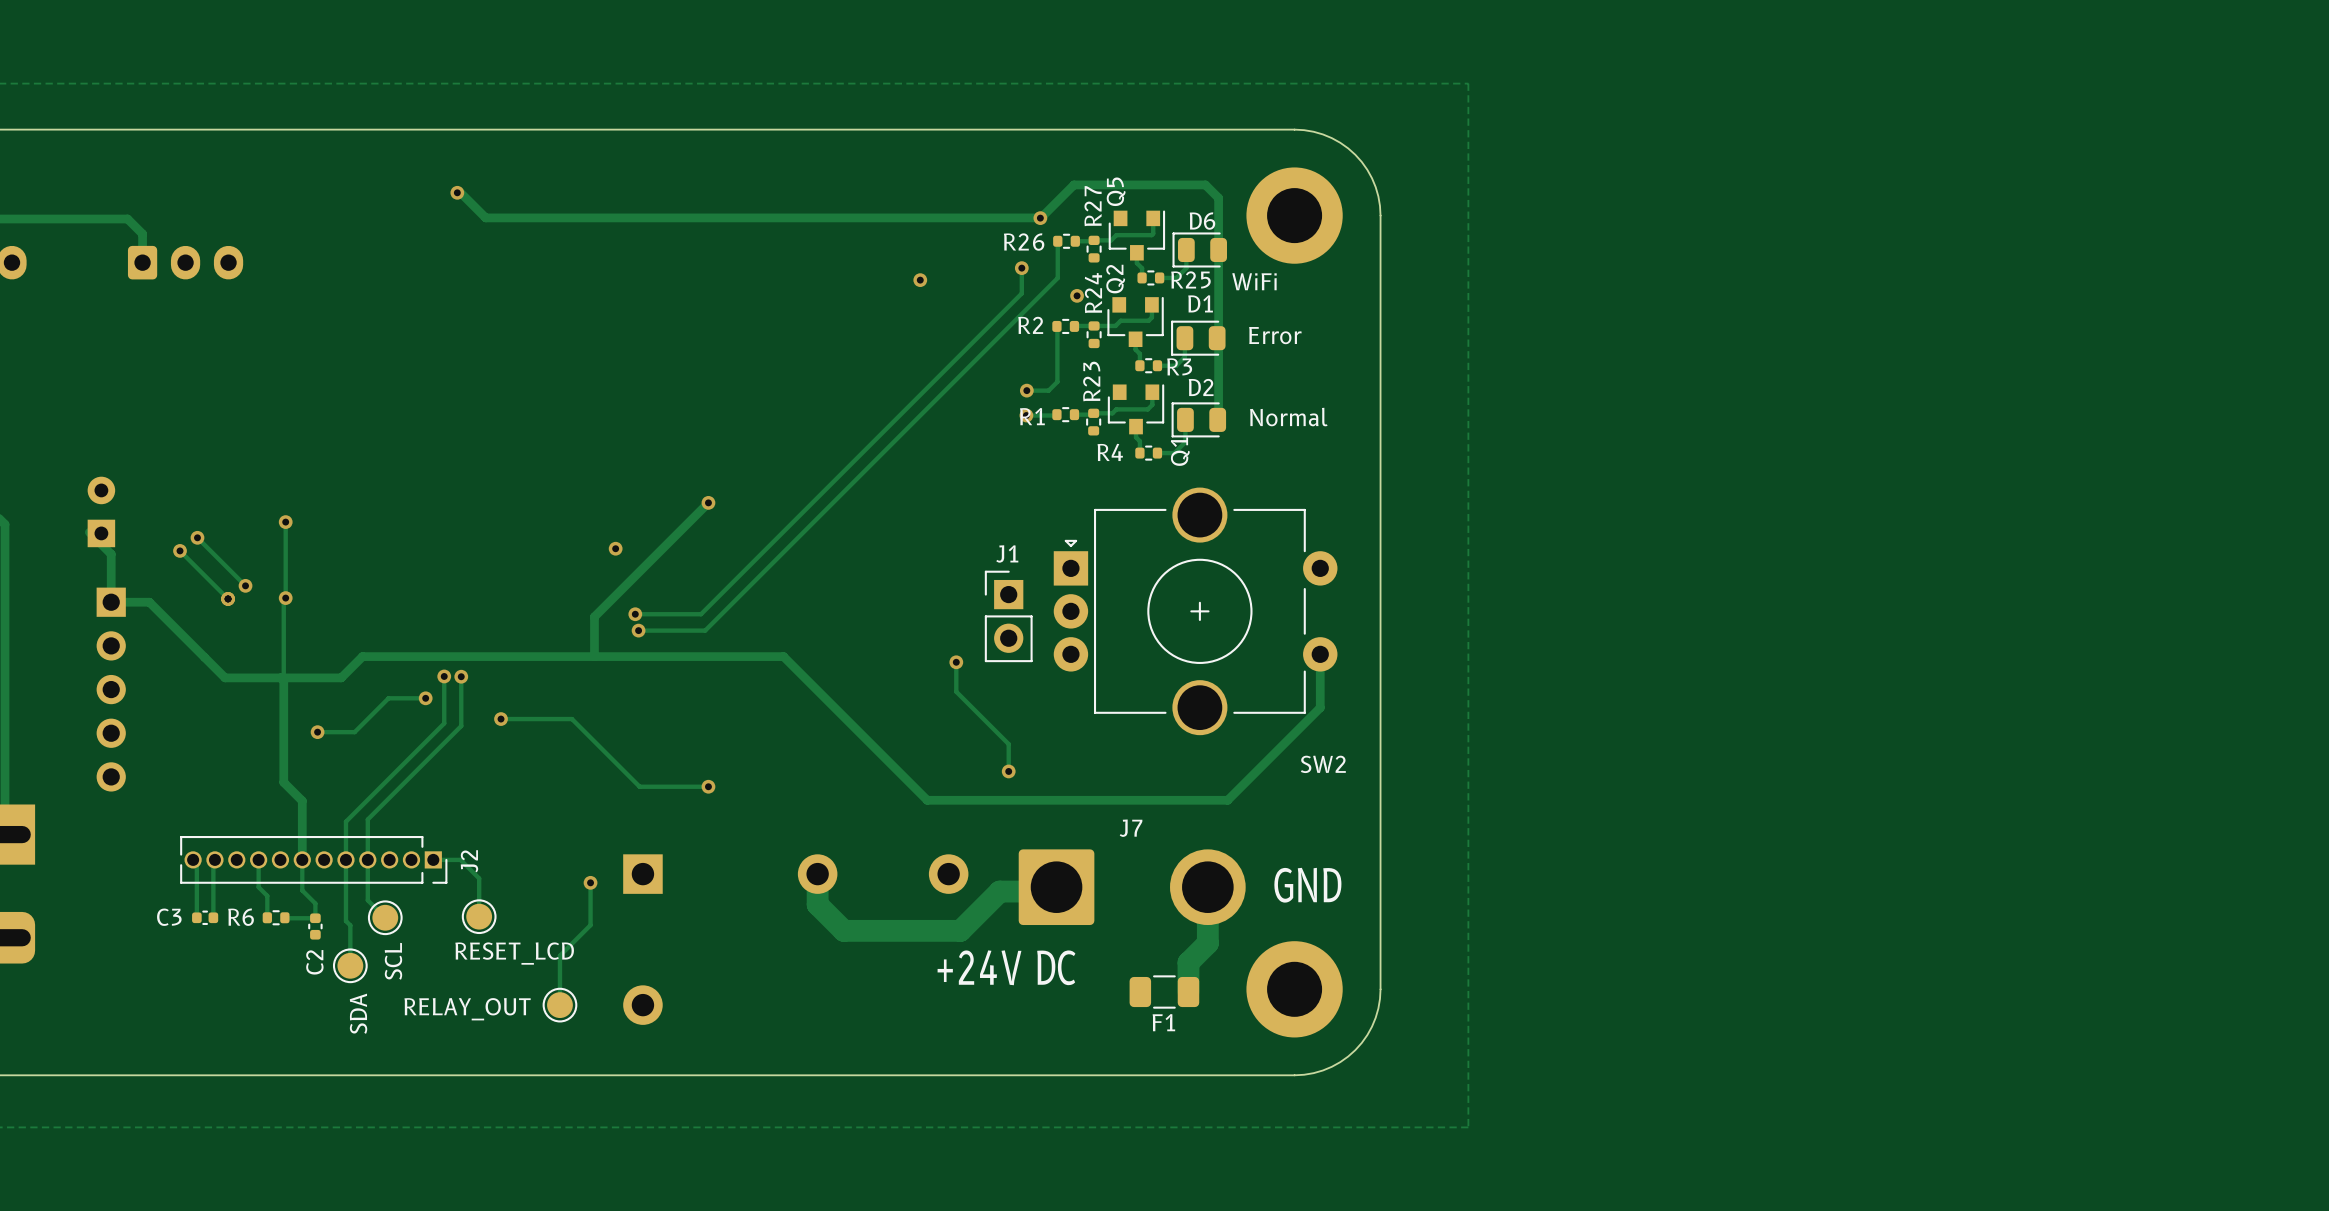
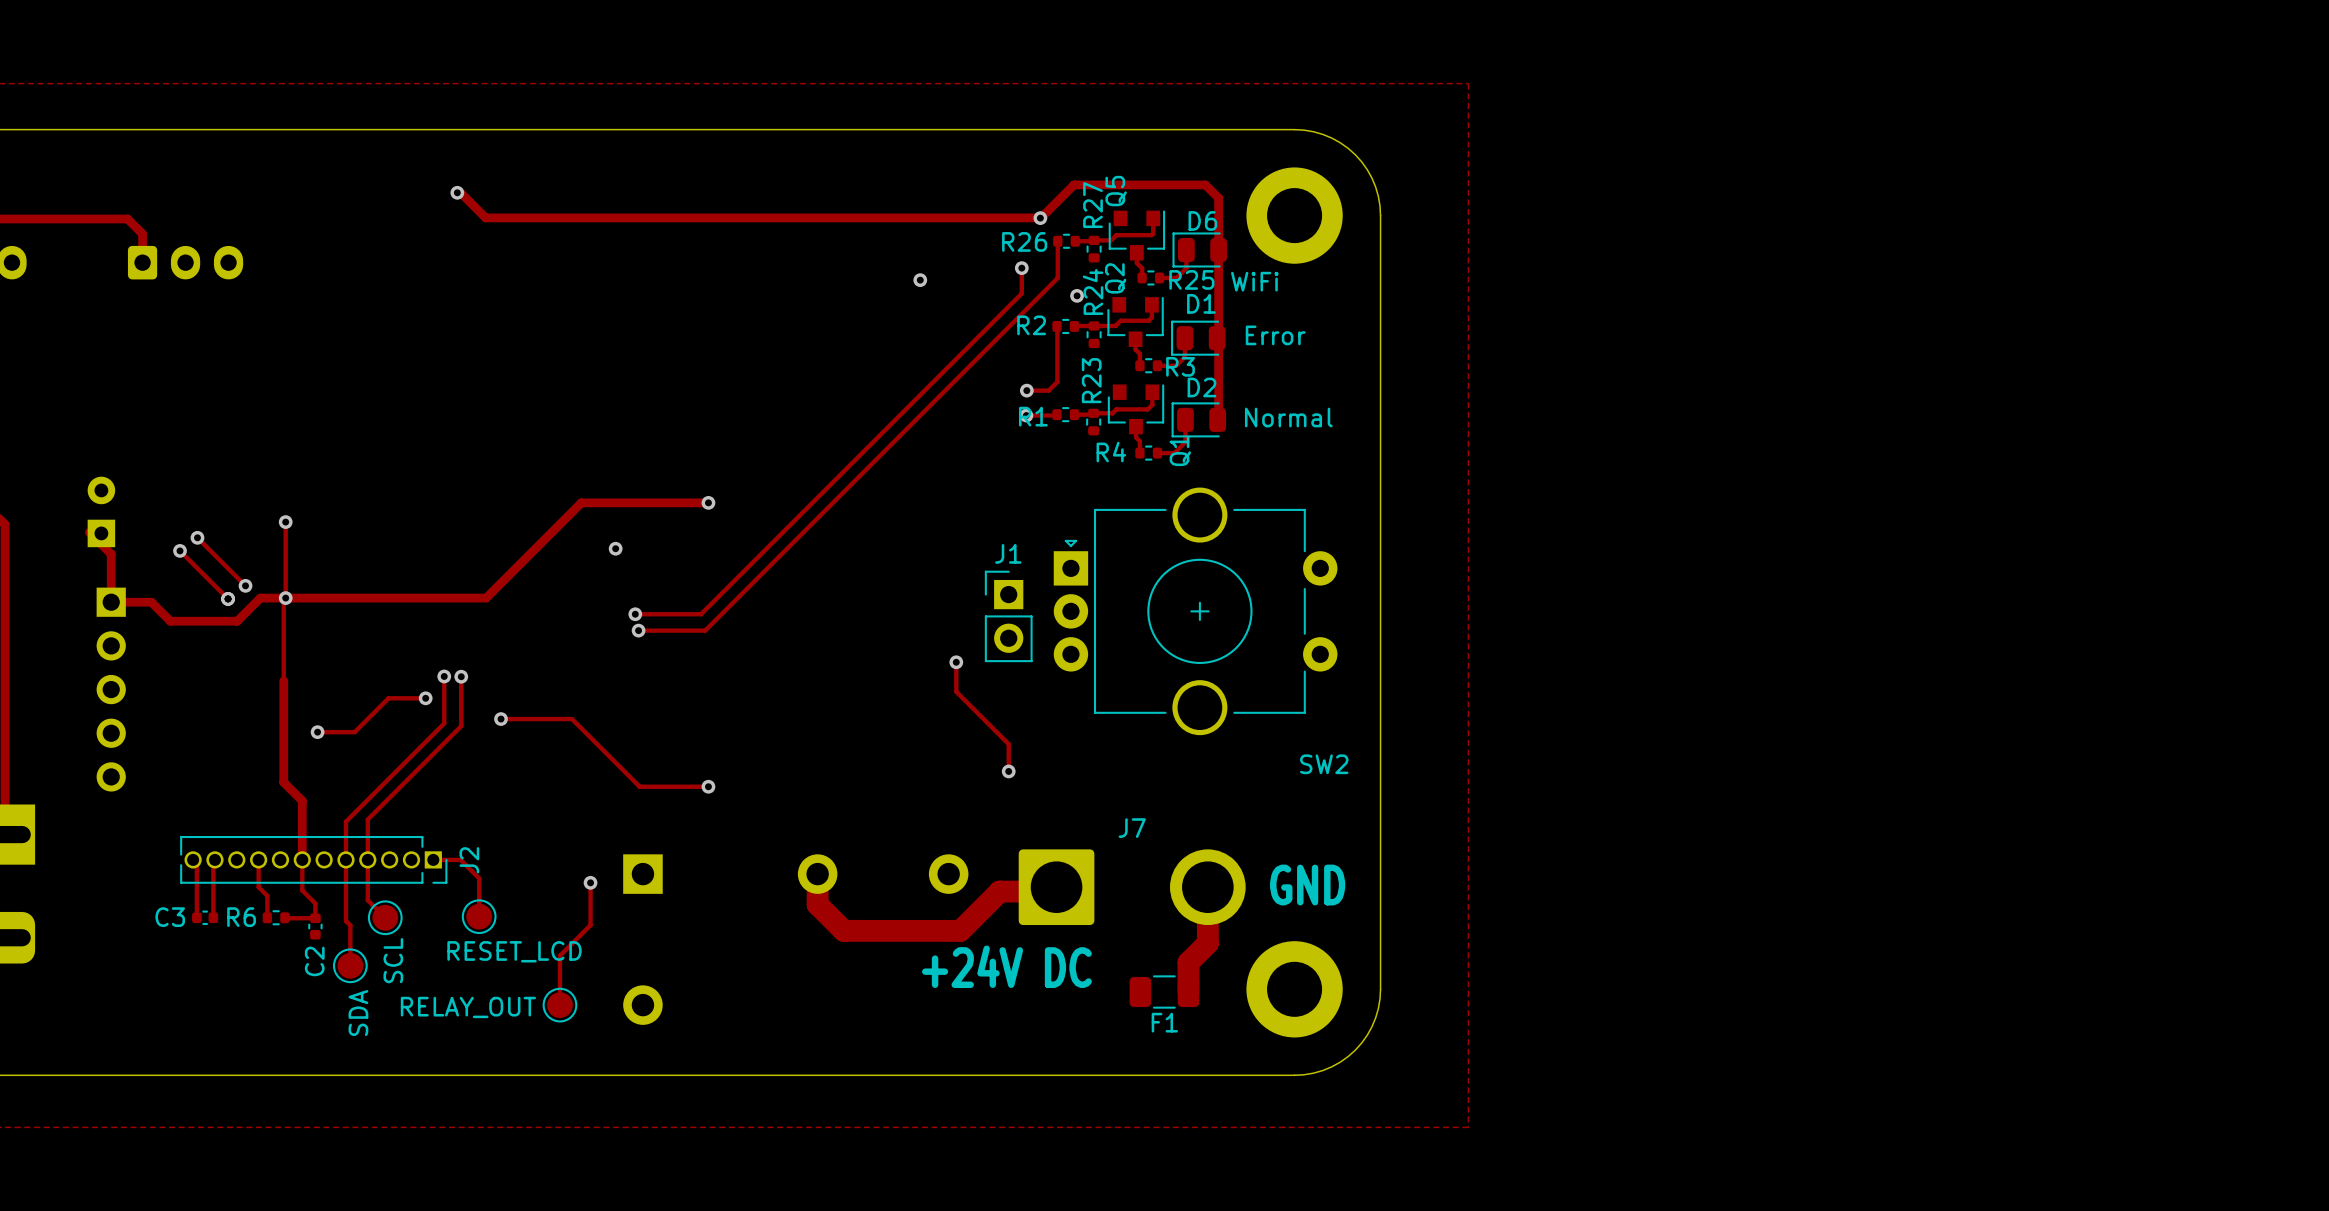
track: (708, 502) (594, 616) (594, 656) -> (708, 502) (581, 502) (486, 598) (260, 598) (237, 621) (170, 621) (149, 602)
track: (149, 602) (225, 677) (280, 677) -> none
track: (1320, 654) (1320, 707) (1227, 800) (927, 800) (783, 656) (362, 656) (341, 677) (280, 677) (283, 680) -> none

